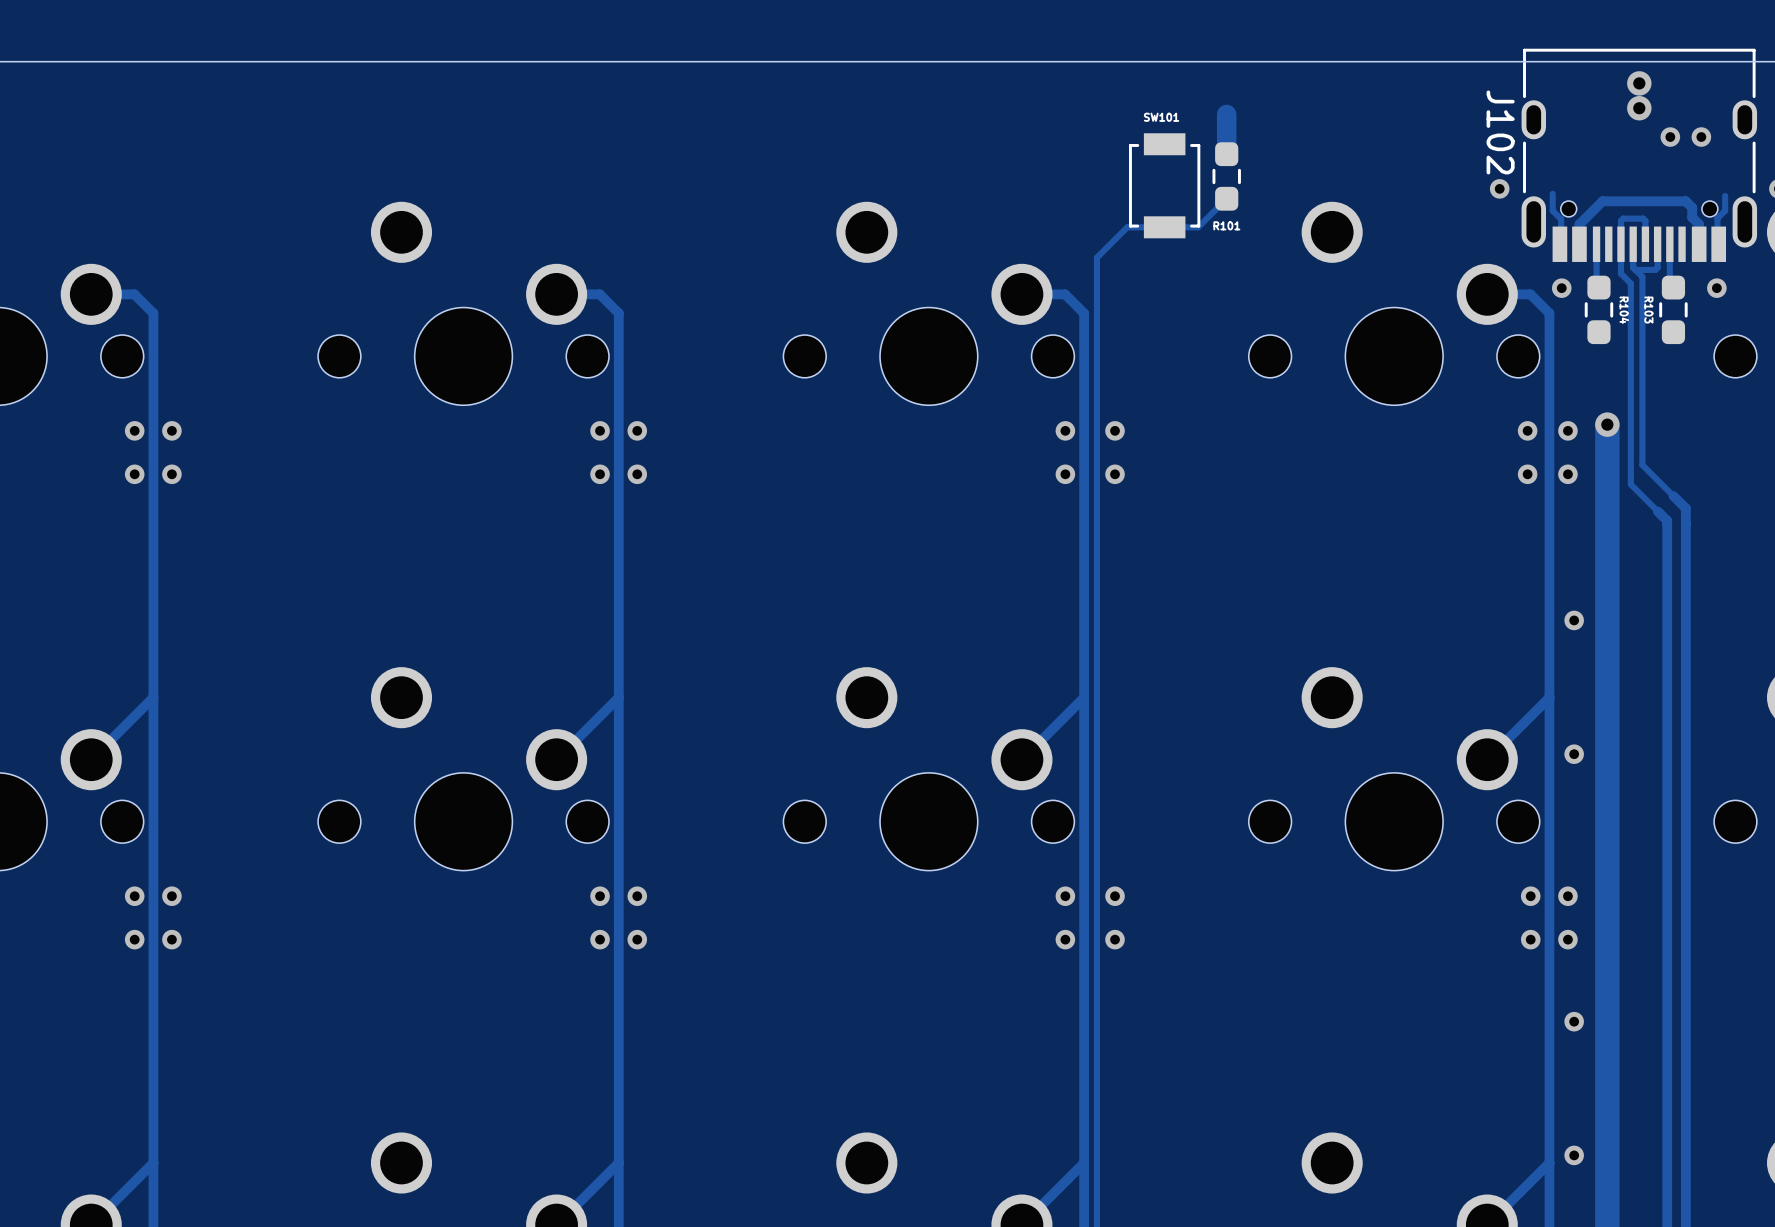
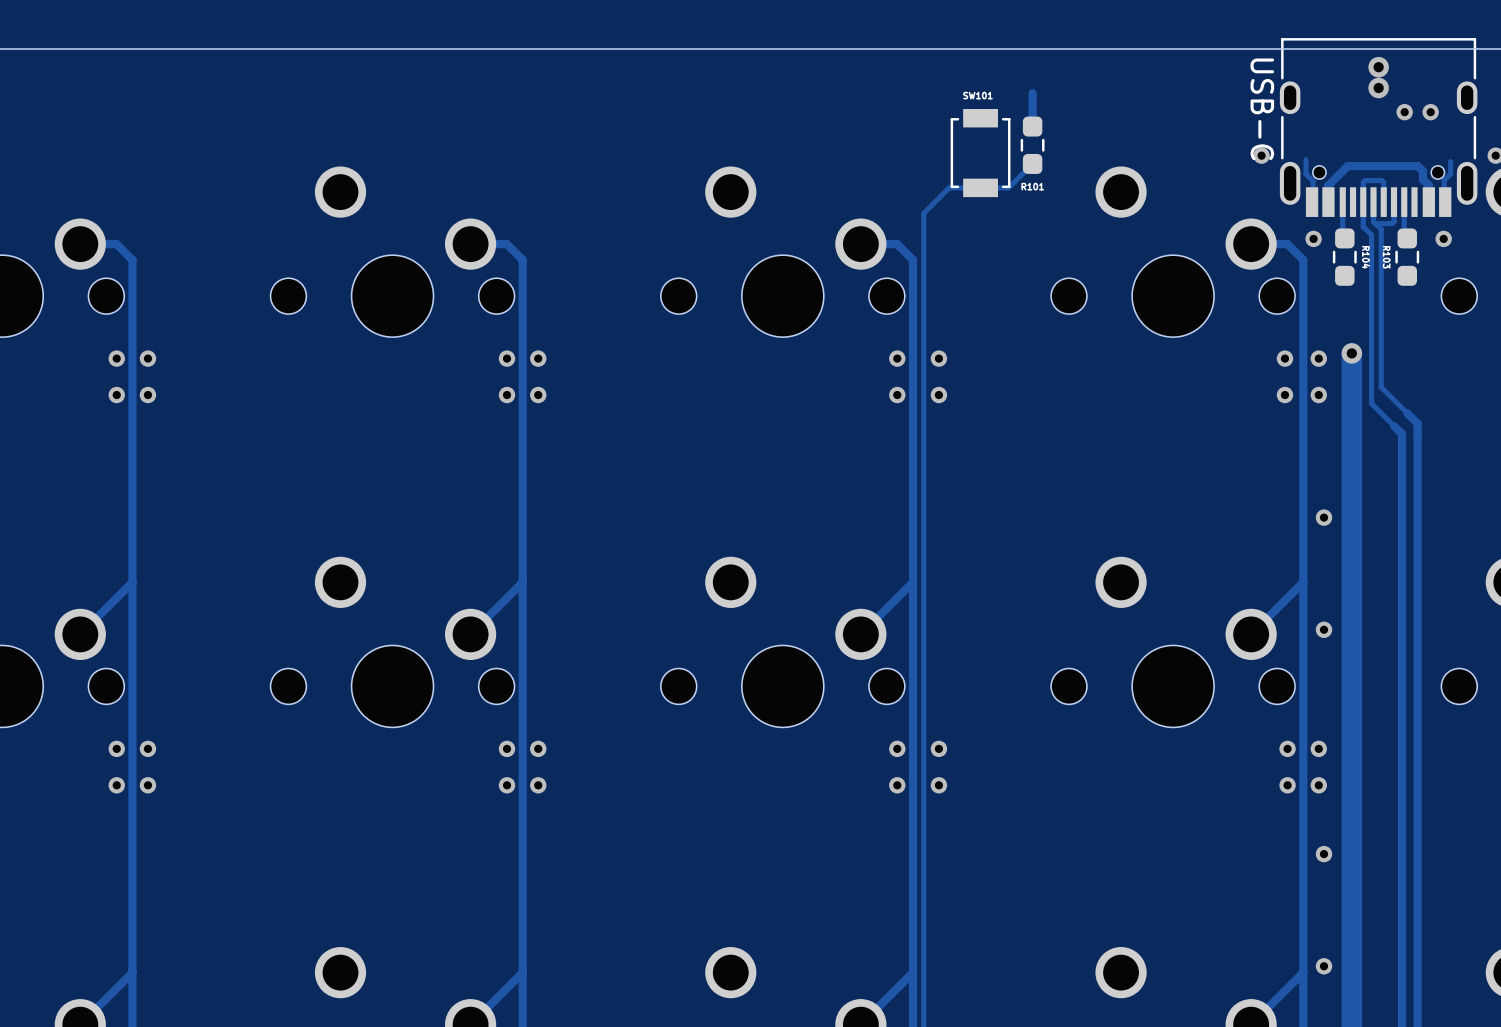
track width: thick (1226, 114) (1226, 154) -> thin (1032, 93) (1032, 126)
J102 name: J102 (1500, 132) -> USB-C (1262, 109)

